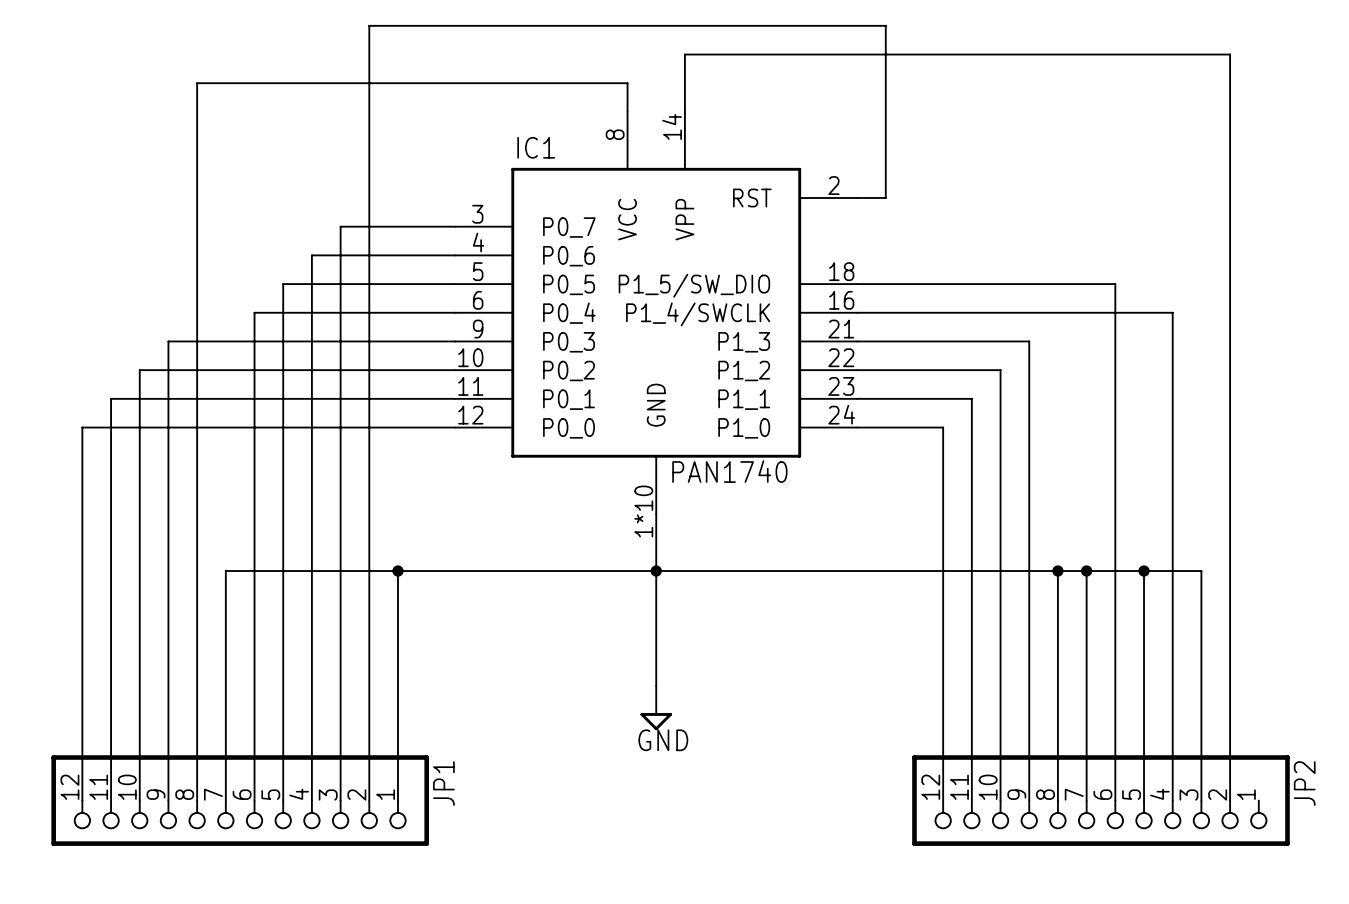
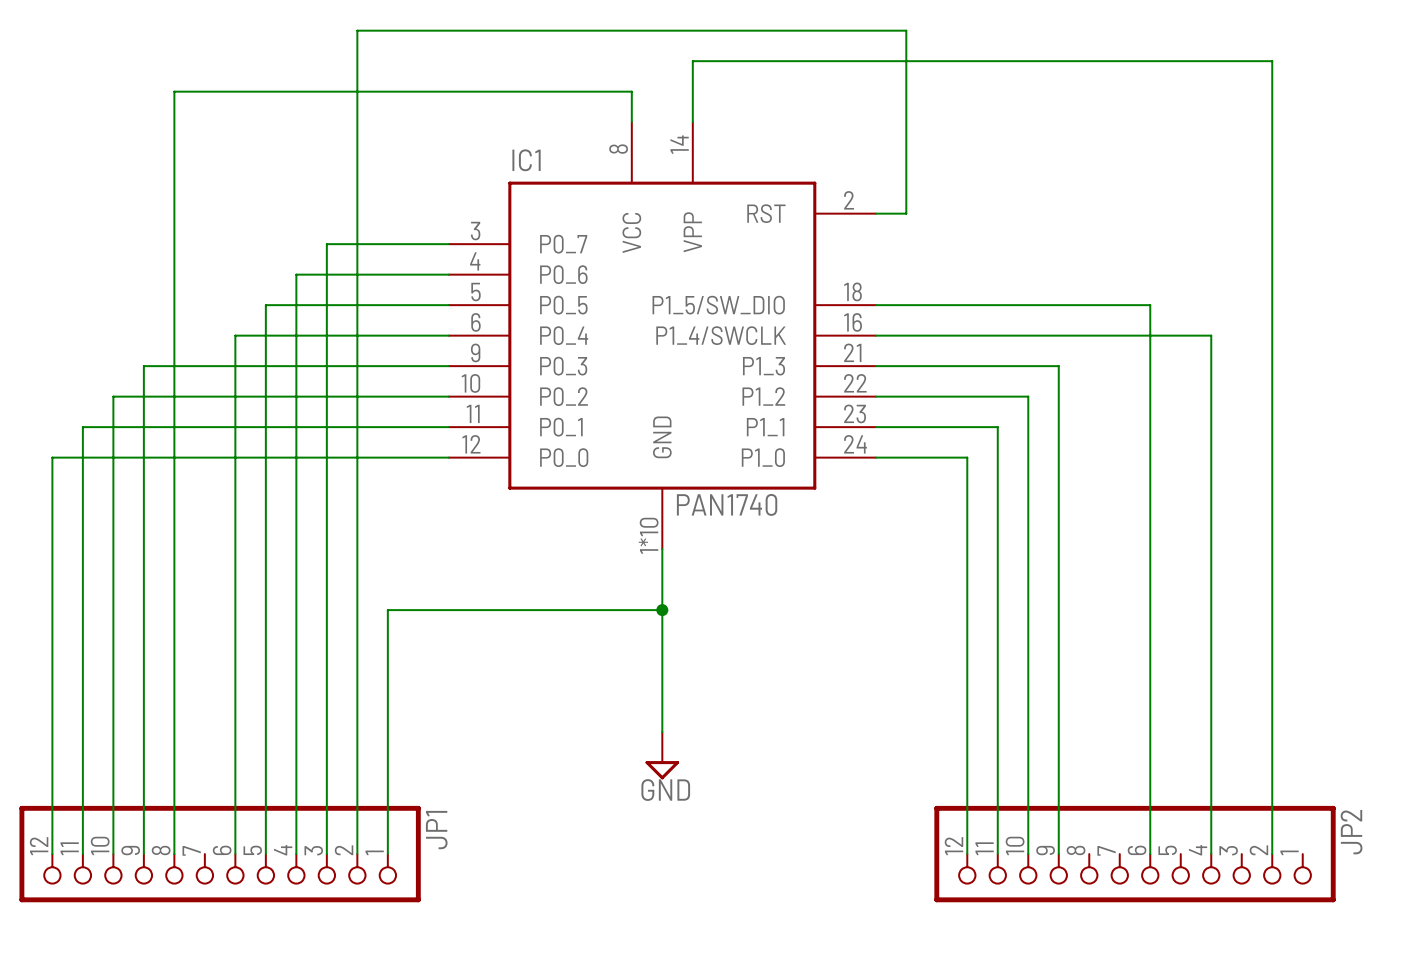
wire: (397, 571) (225, 571) (225, 800) -> none
junction: (397, 571) -> none
wire: (656, 571) (1201, 571) (1201, 800) -> none
wire: (1057, 571) (1057, 800) -> none
junction: (1057, 571) -> none
wire: (1086, 571) (1086, 800) -> none
junction: (1086, 571) -> none
wire: (1144, 571) (1144, 800) -> none
junction: (1144, 571) -> none

